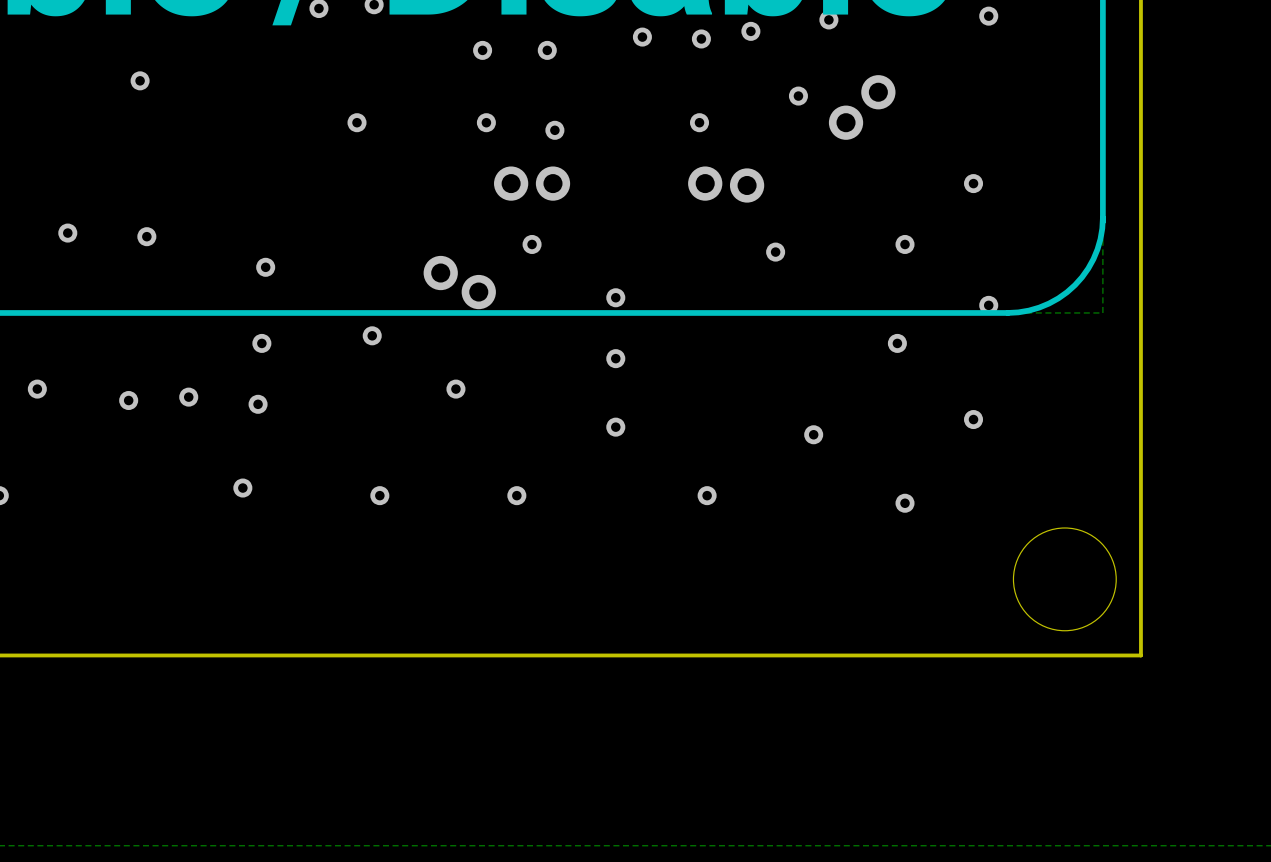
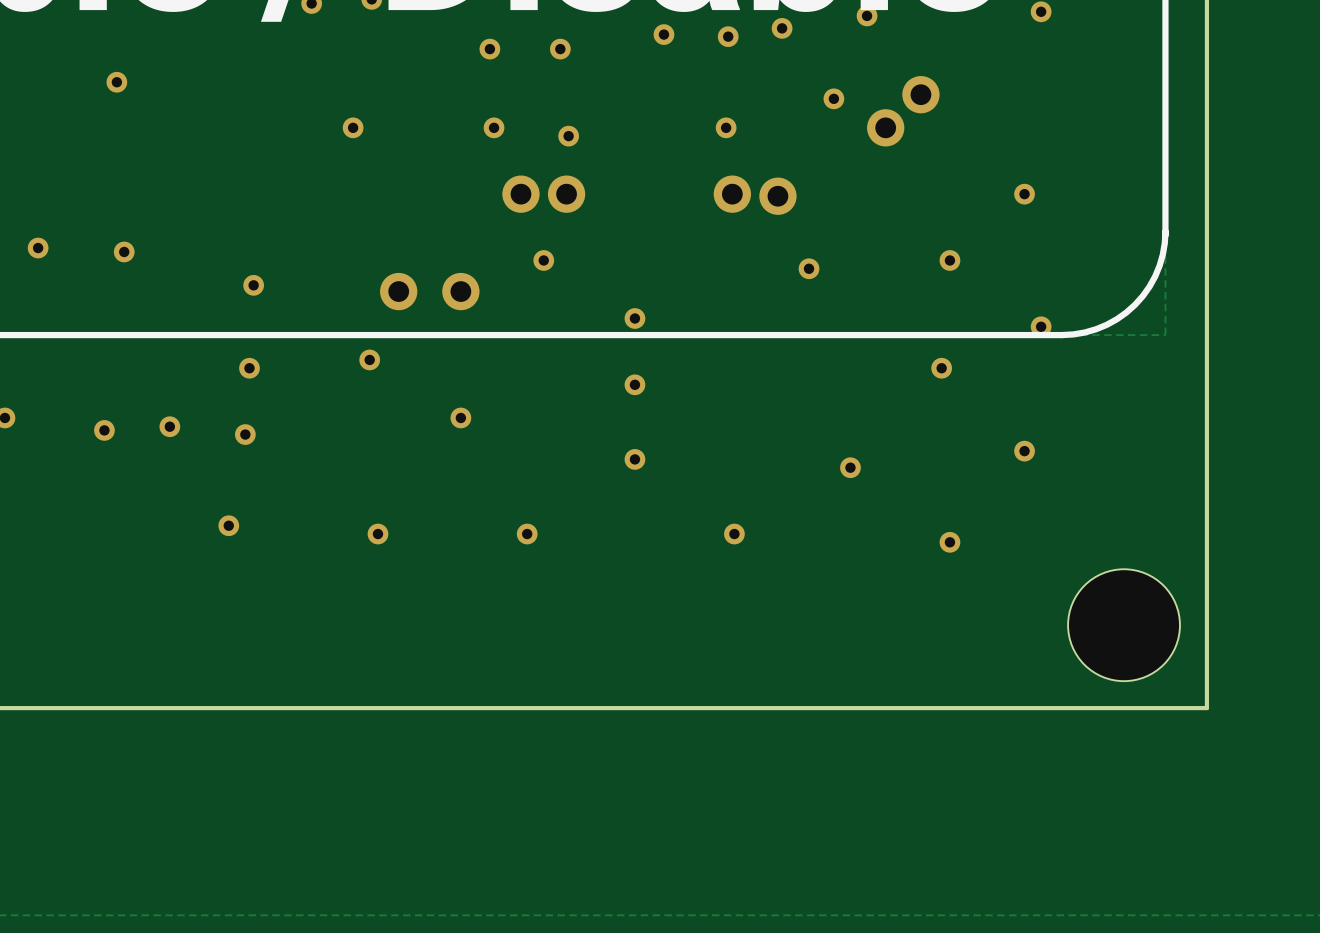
via: none -> (398, 291)
via: (440, 273) -> none
via: none -> (460, 291)
via: (478, 292) -> none

